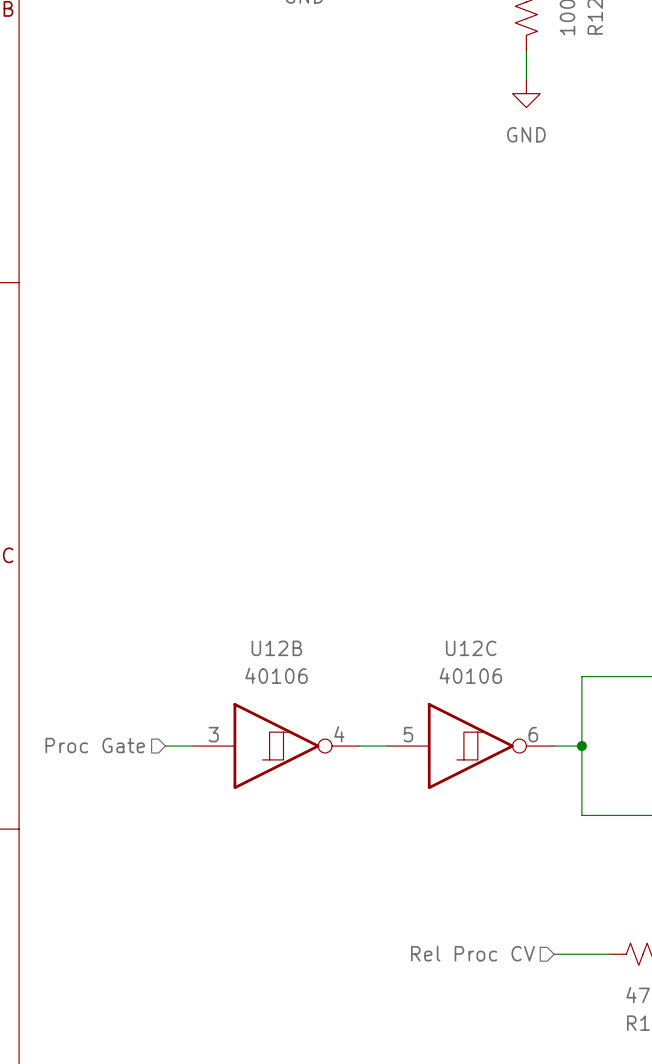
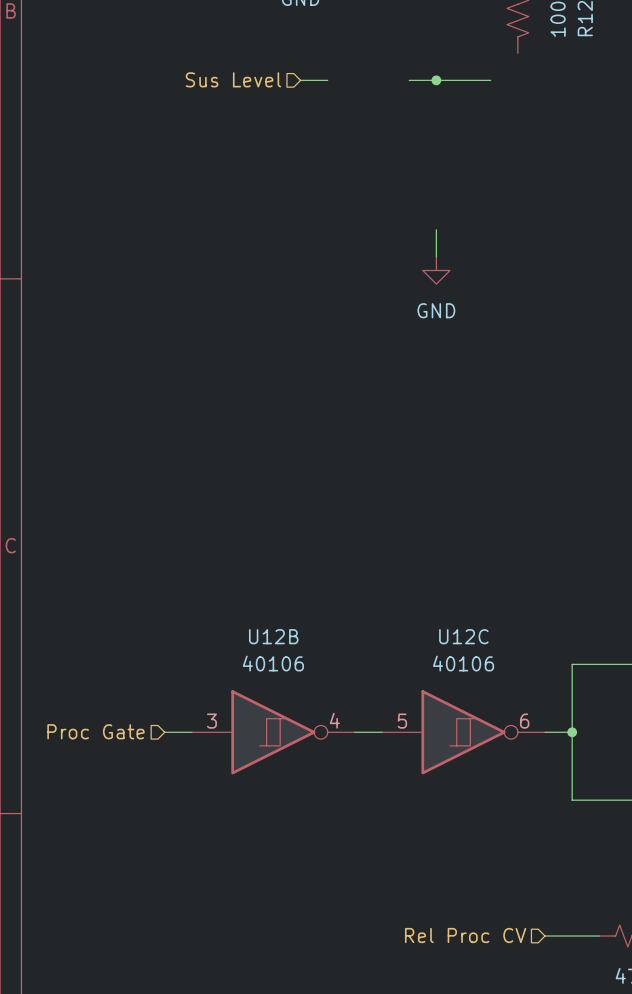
wire: (526, 52) (526, 79) -> (436, 229) (436, 256)
hierarchical label: none -> Sus Level (233, 79)
wire: none -> (300, 80) (327, 80)
wire: none -> (409, 80) (490, 80)
junction: none -> (436, 80)
power symbol position: GND (526, 93) -> GND (436, 270)

